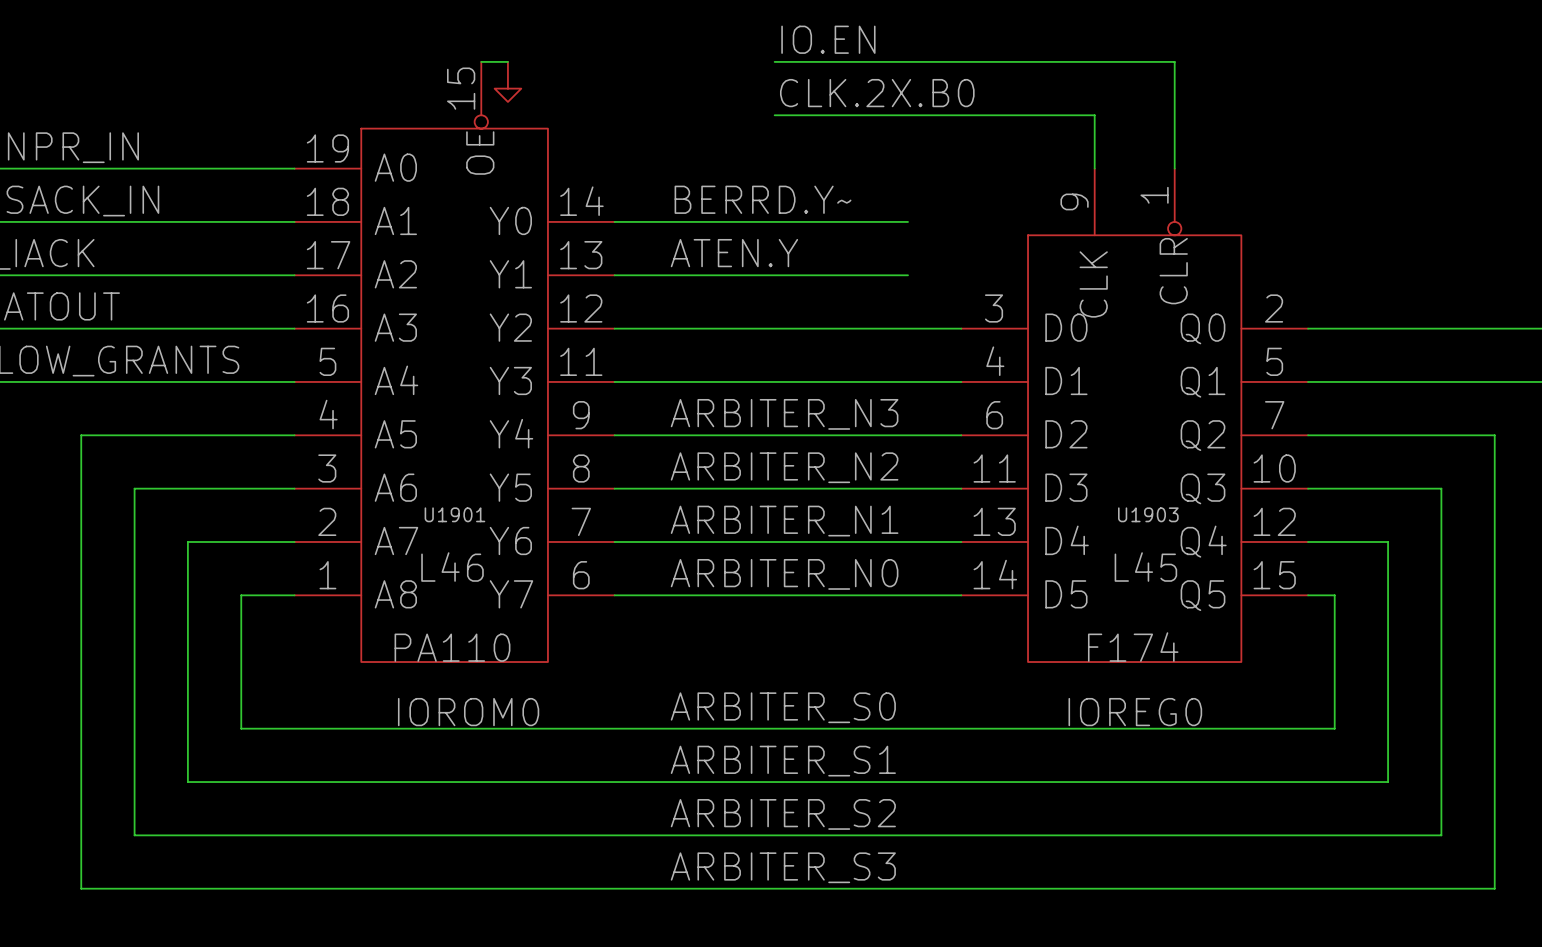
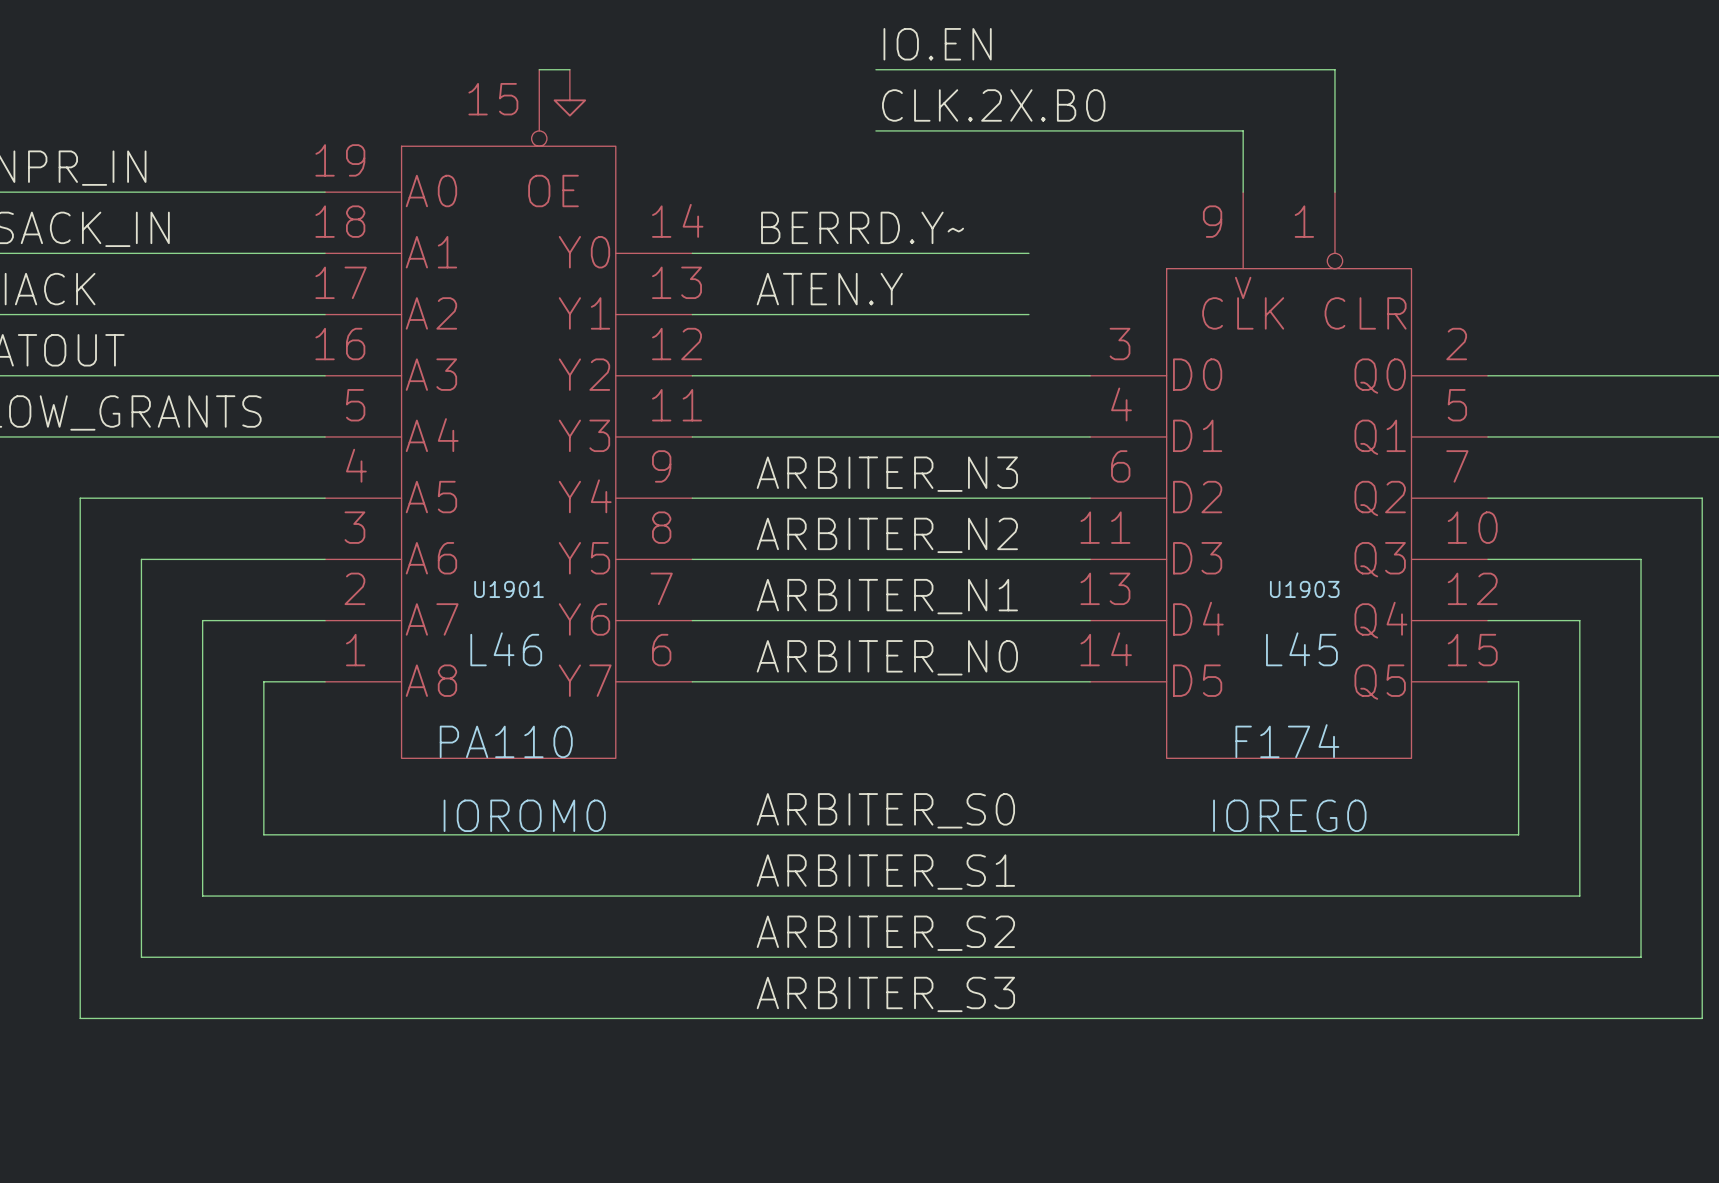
U1901 symbol: [294, 61, 615, 663] -> [325, 69, 693, 759]
U1903 symbol: [961, 168, 1309, 663] -> [1090, 192, 1489, 759]

